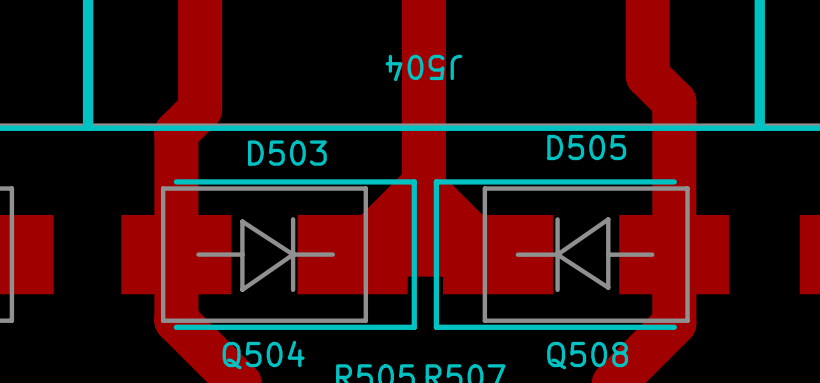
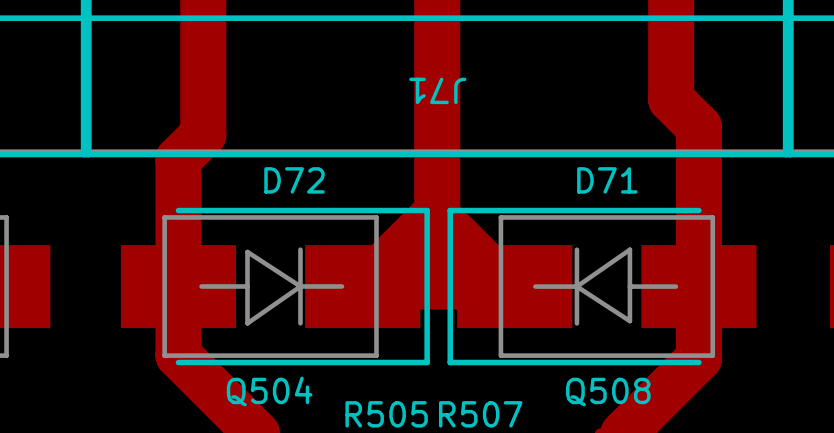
J504 name: J504 (423, 67) -> J71 (437, 90)
D505 name: D505 (586, 147) -> D71 (607, 180)
D503 name: D503 (287, 153) -> D72 (294, 180)

